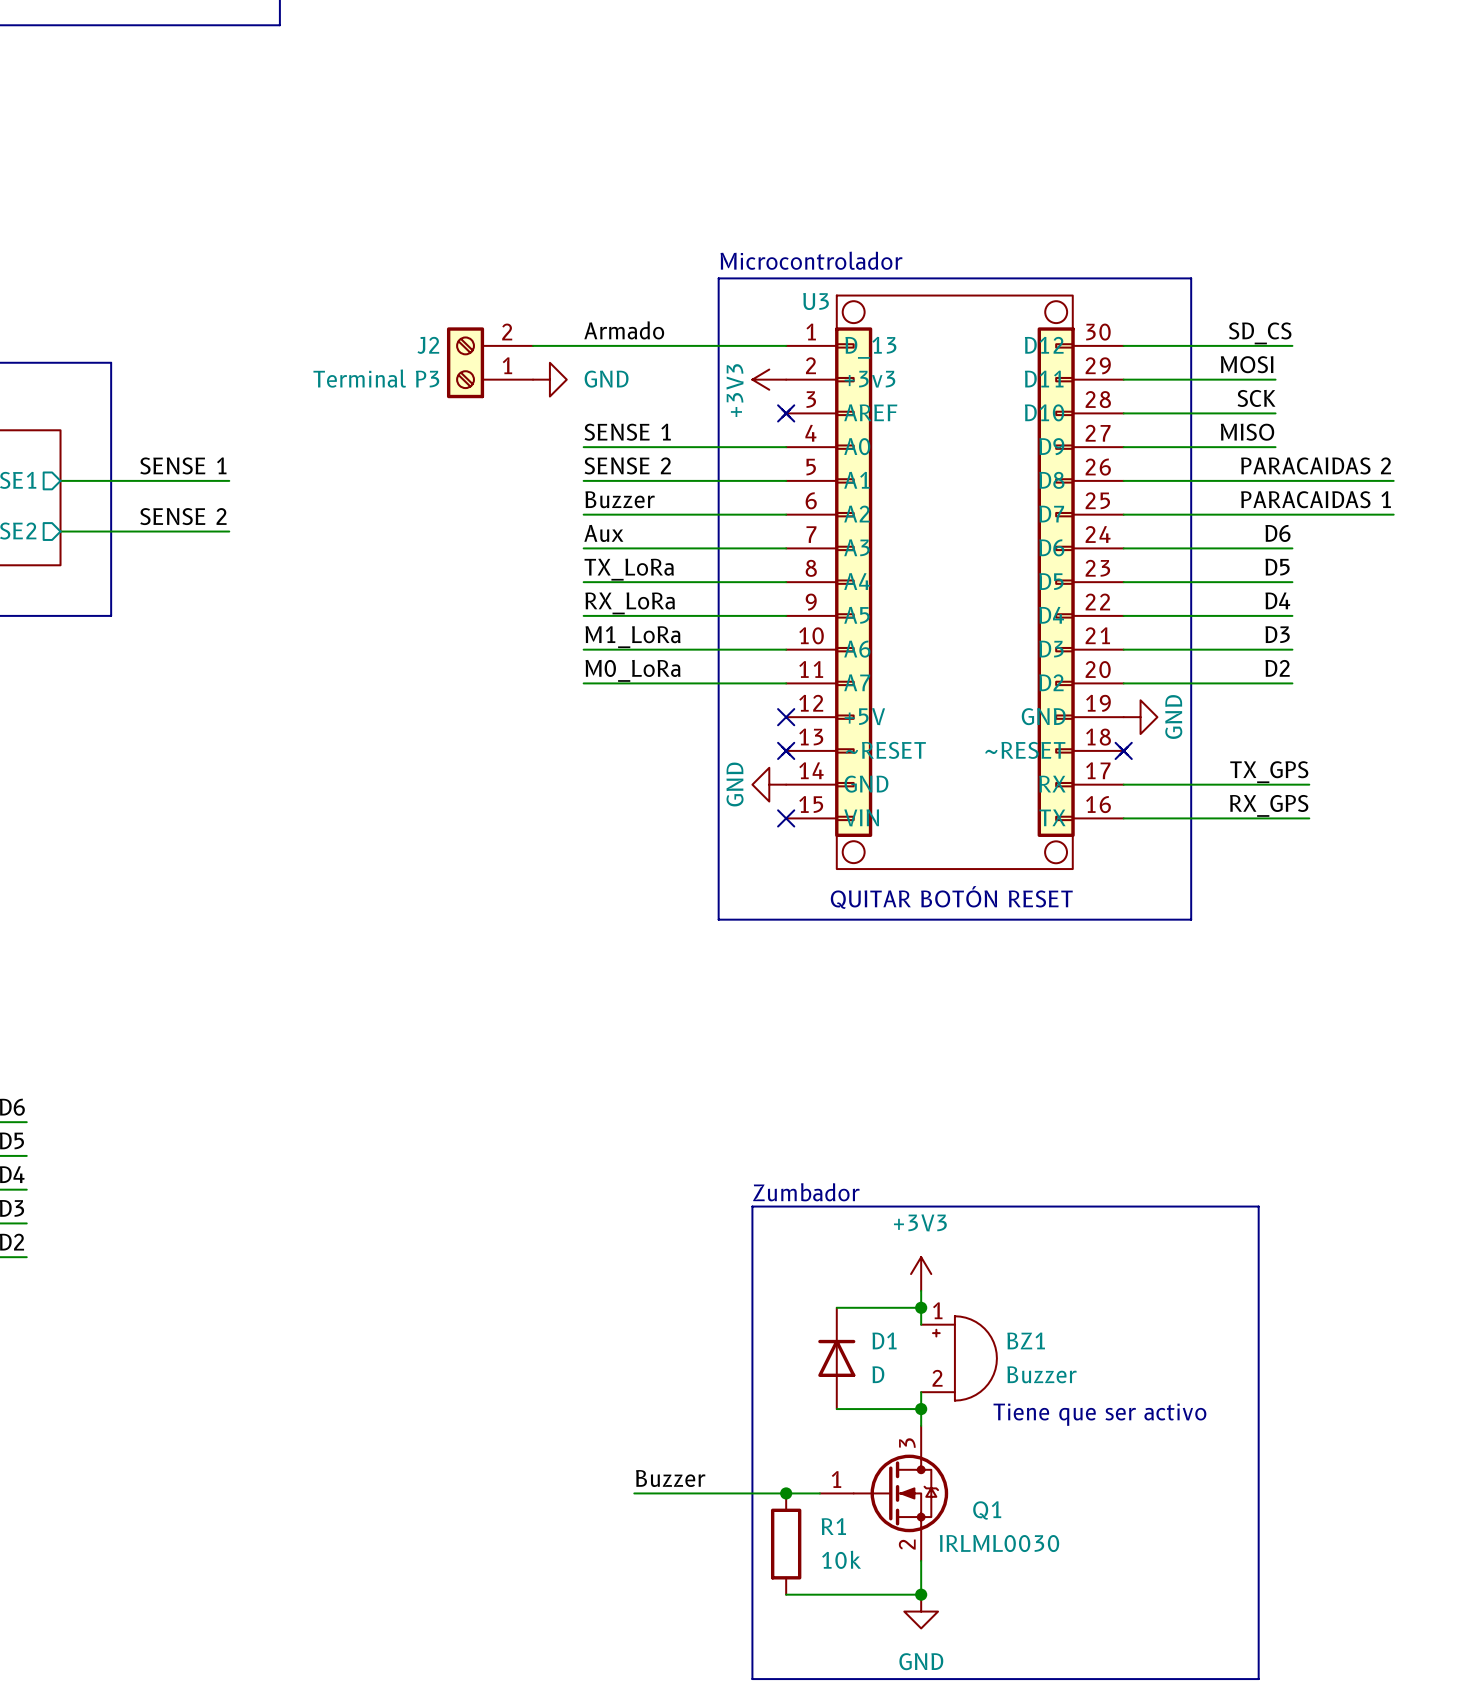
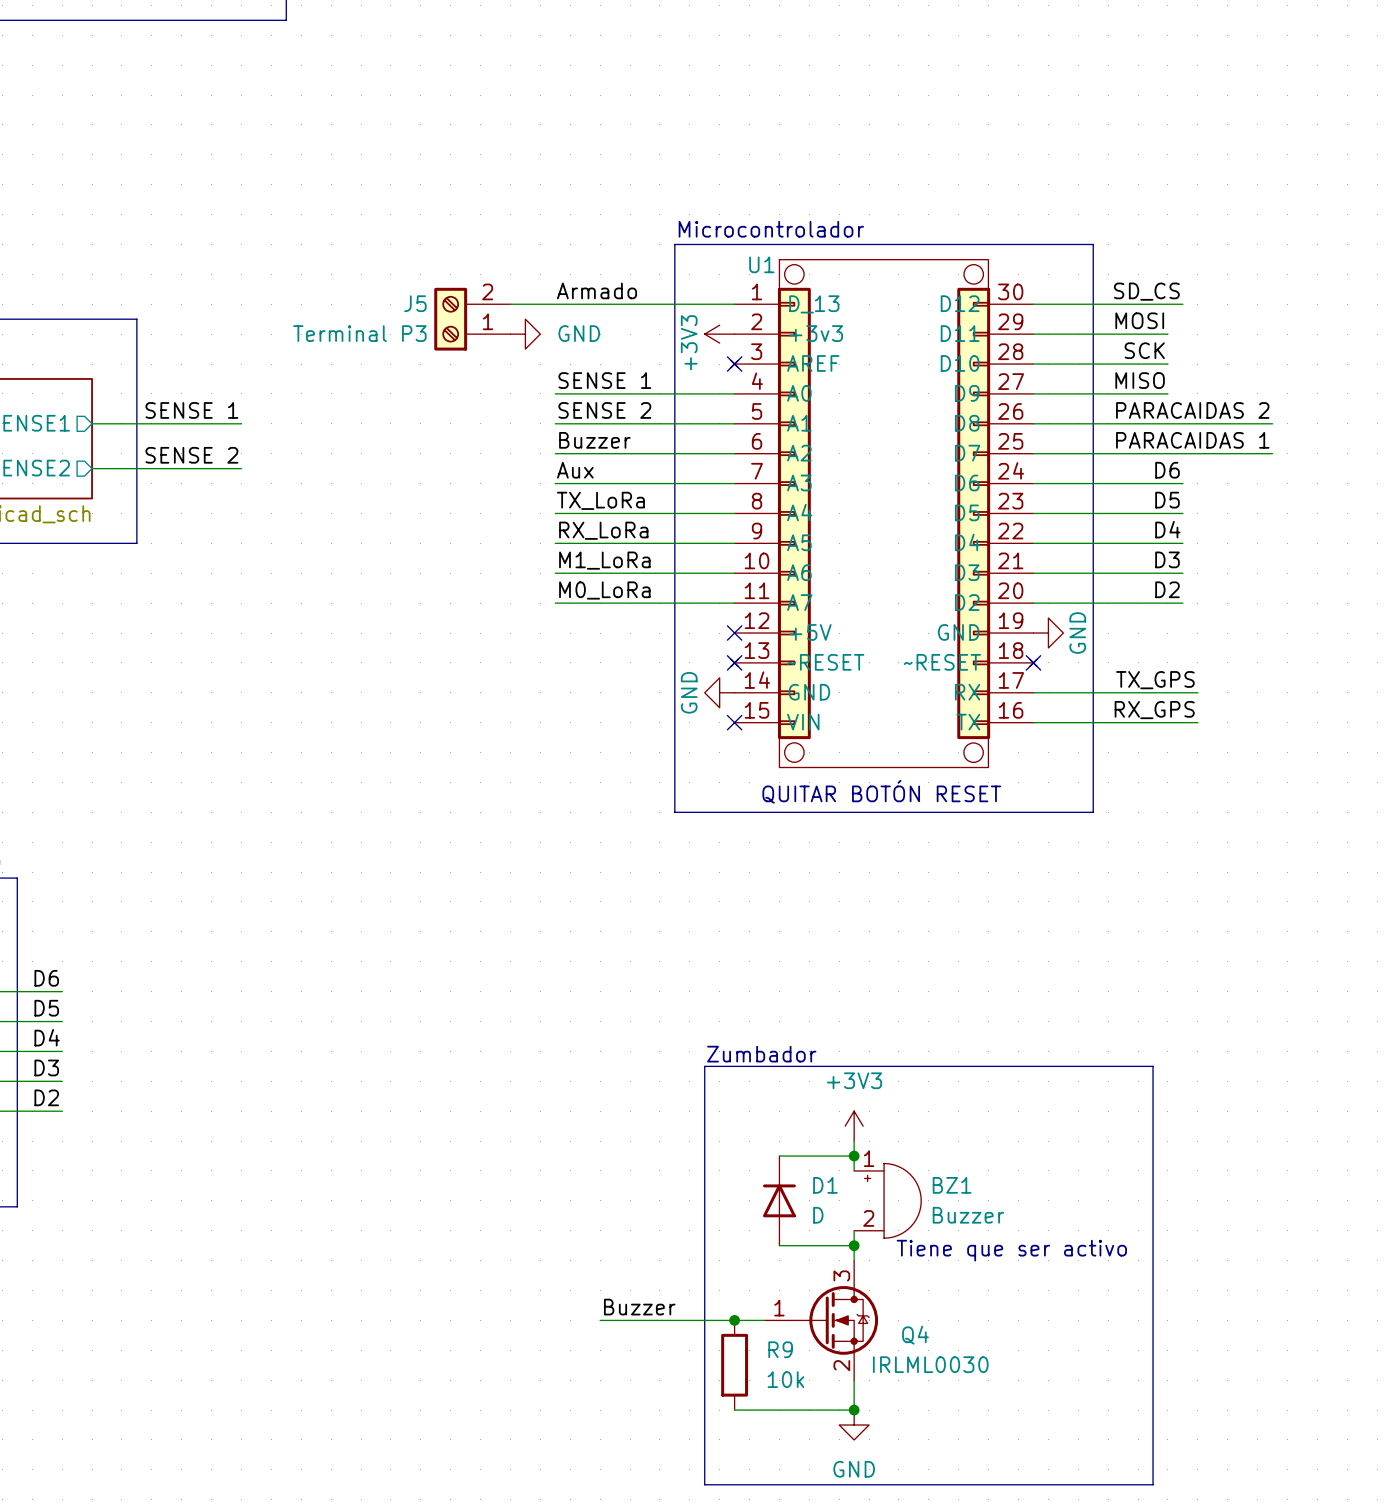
U3 name: U3 (816, 301) -> U1 (761, 264)
J2 name: J2 (428, 345) -> J5 (415, 303)
Q1 name: Q1 (987, 1510) -> Q4 (915, 1335)
R1 name: R1 (833, 1526) -> R9 (780, 1349)

